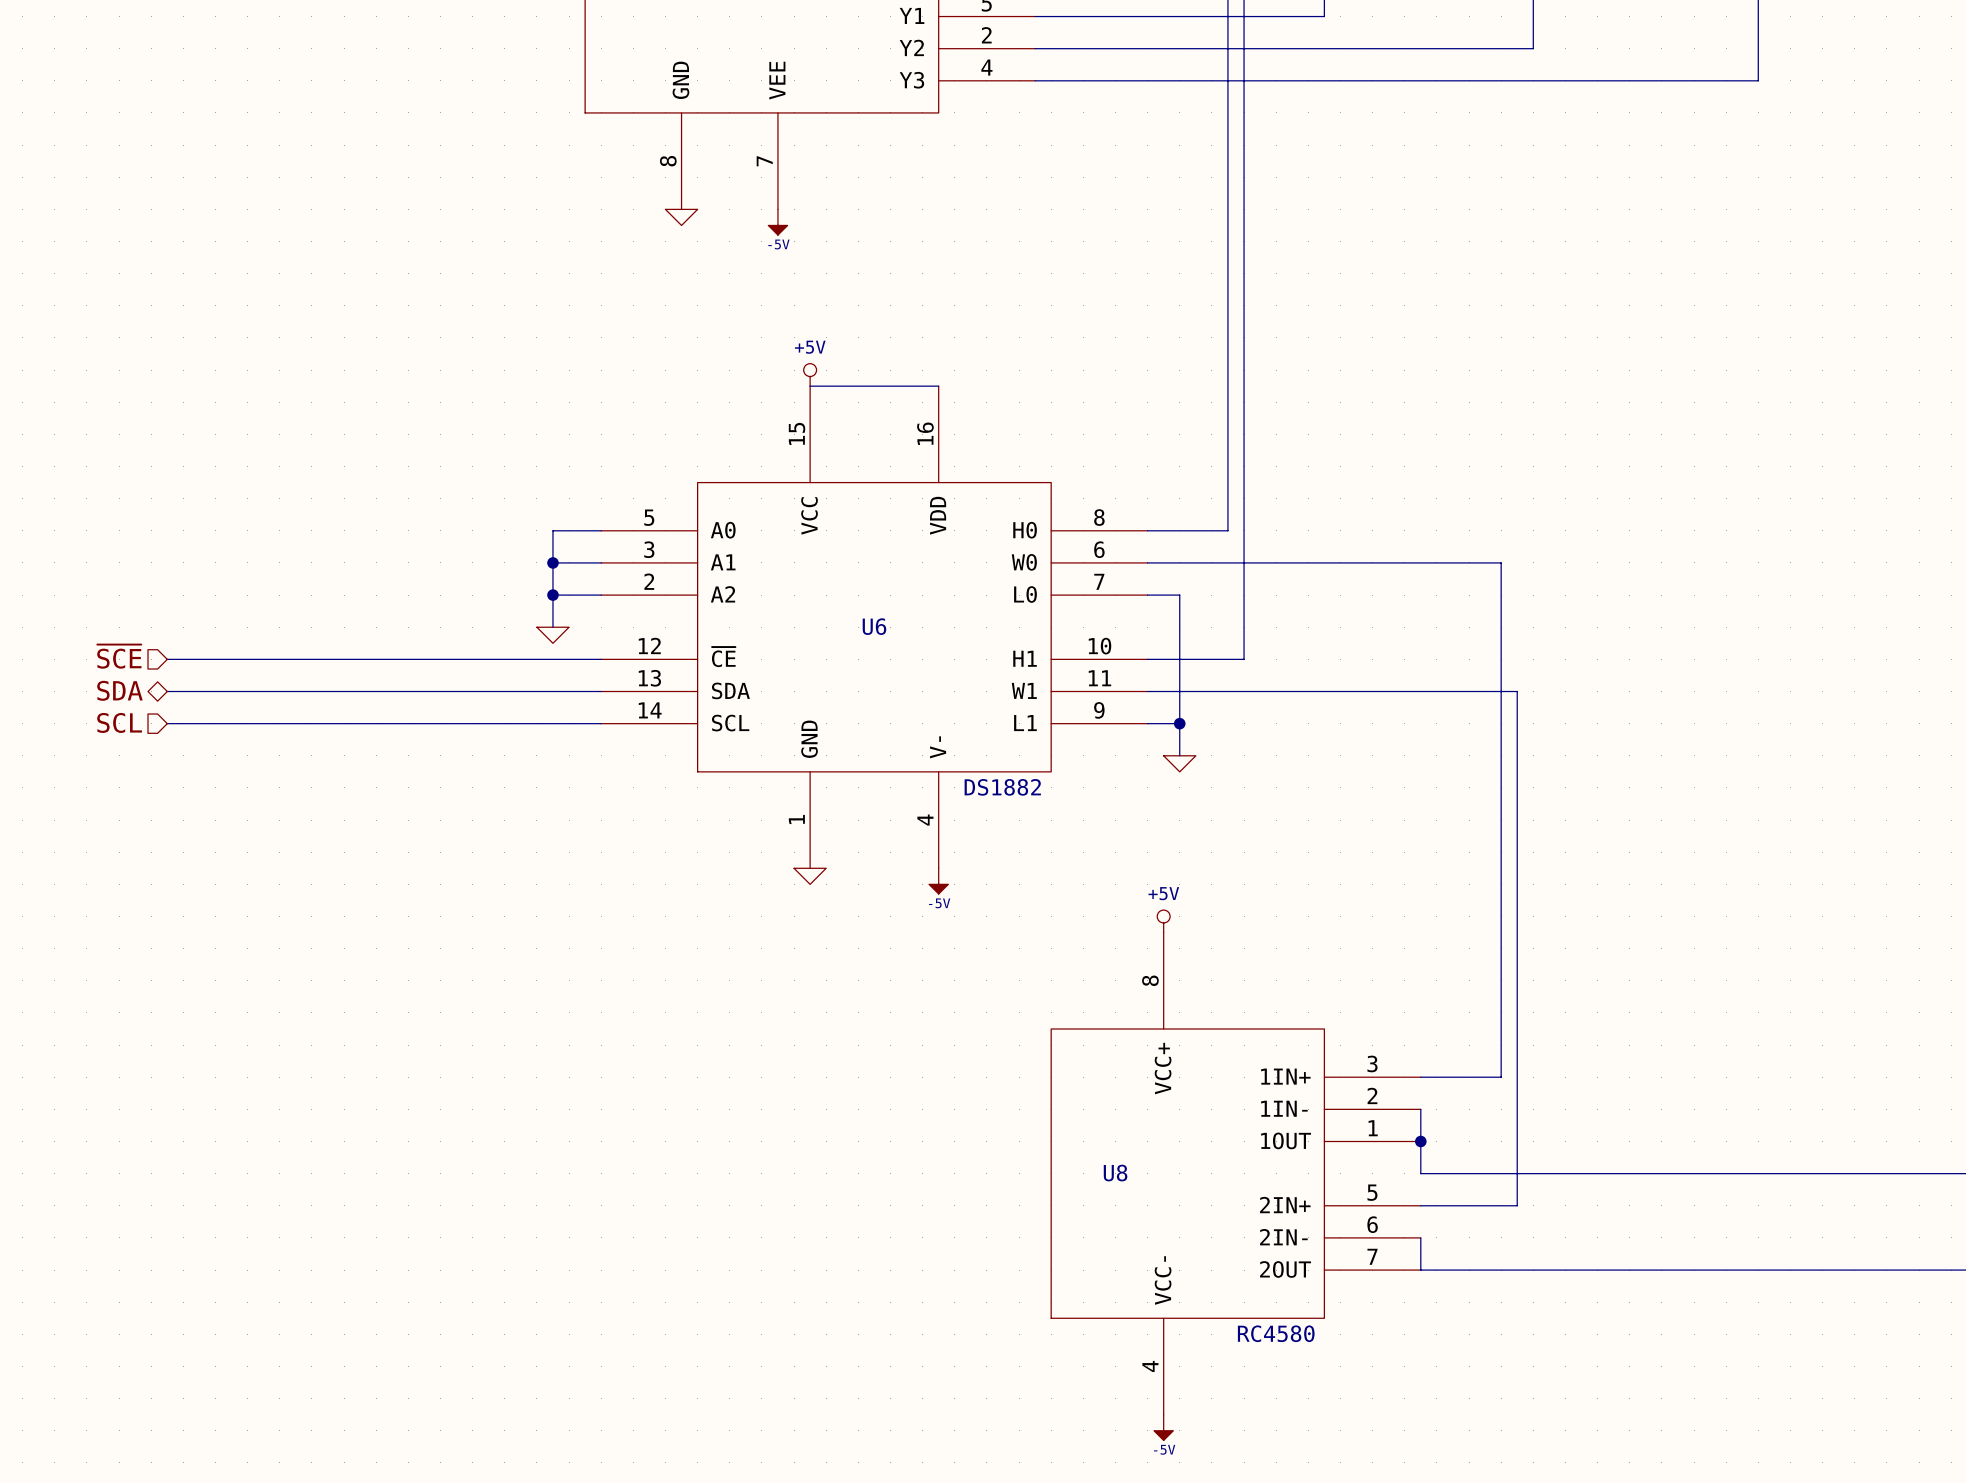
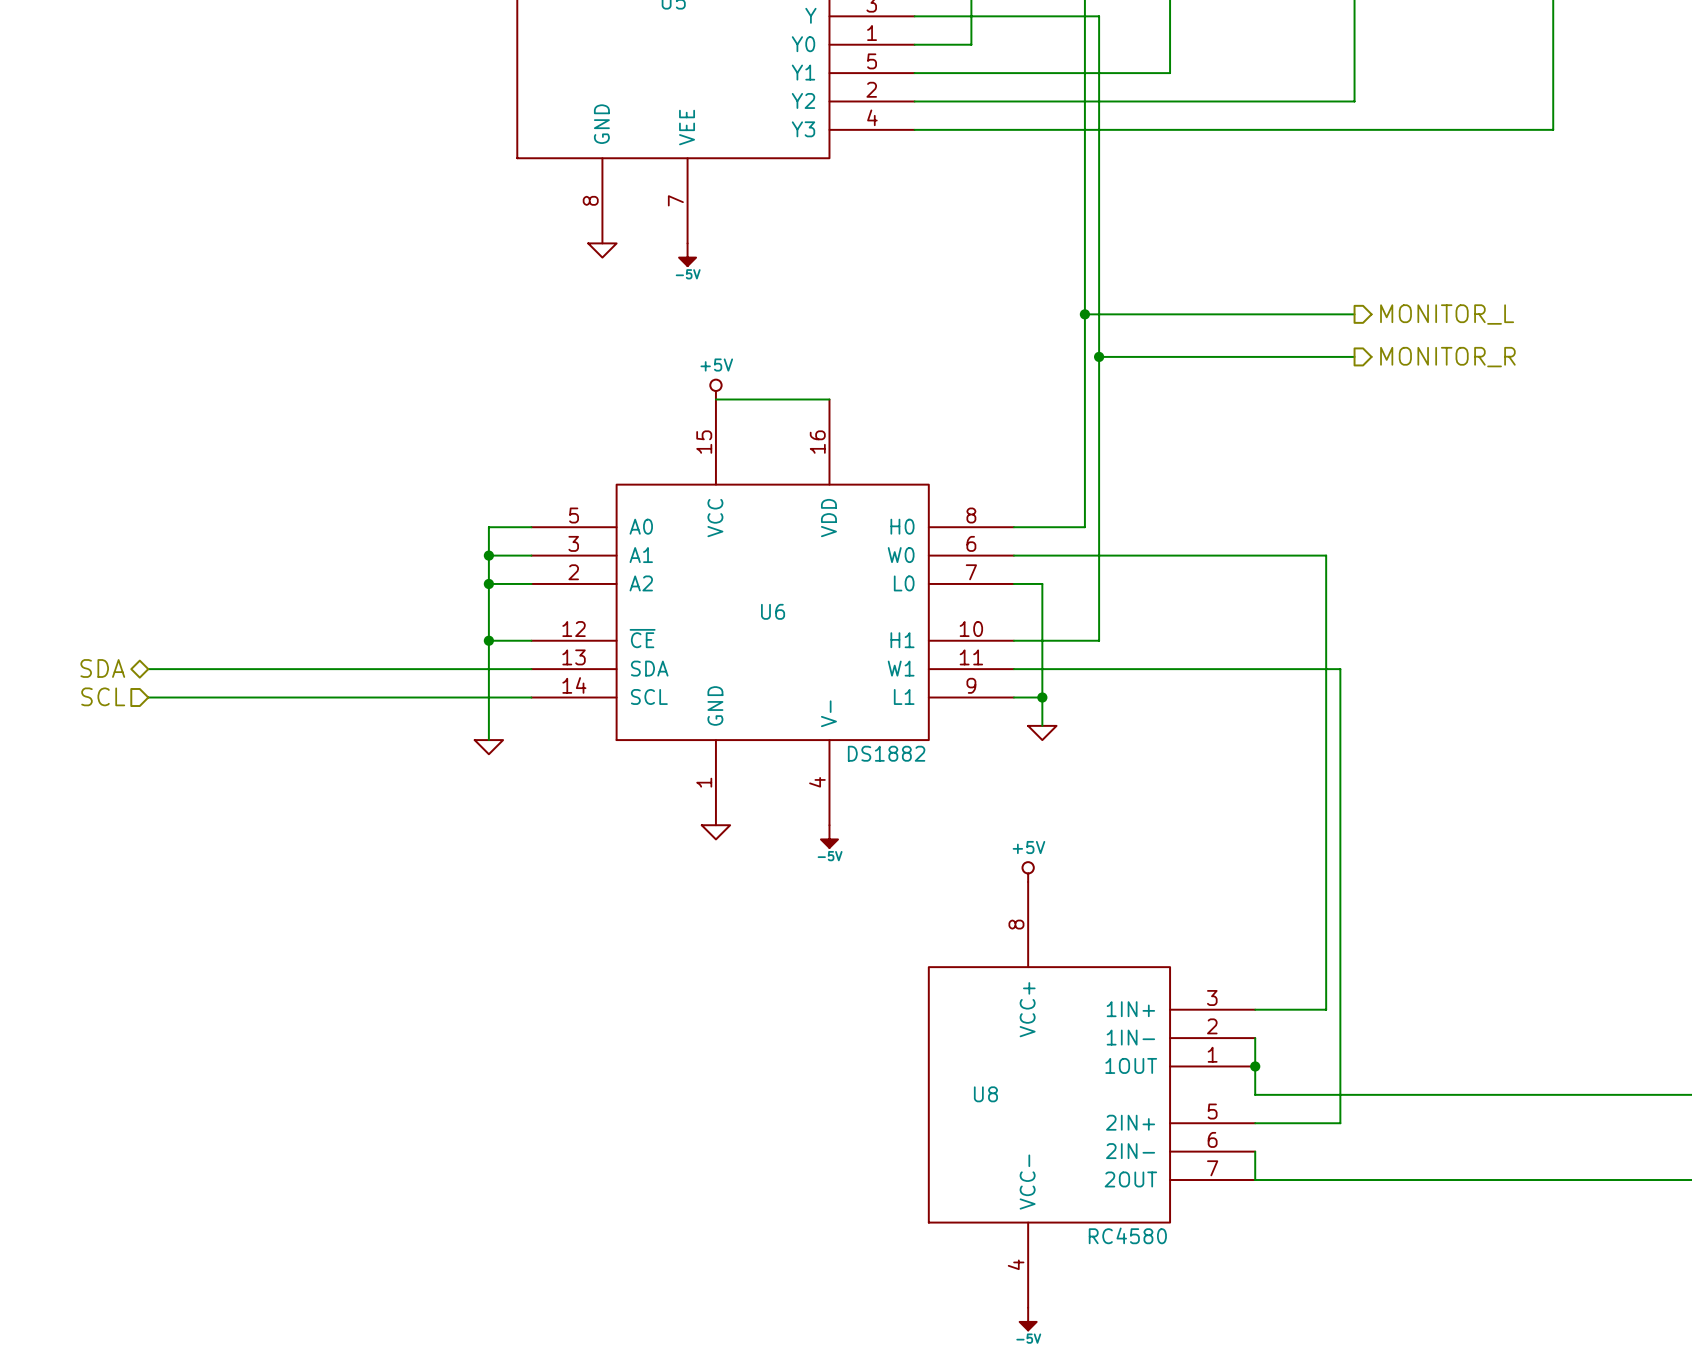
wire: none -> (1084, 314) (1354, 314)
junction: none -> (1084, 314)
hierarchical label: none -> MONITOR_L (1447, 314)
wire: none -> (1099, 356) (1354, 356)
junction: none -> (1099, 356)
hierarchical label: none -> MONITOR_R (1447, 357)
wire: none -> (488, 612) (488, 740)
power symbol position: (552, 635) -> (488, 747)
hierarchical label: ~{SCE} (119, 656) -> none
wire: (167, 659) (552, 659) -> none
junction: none -> (488, 640)

